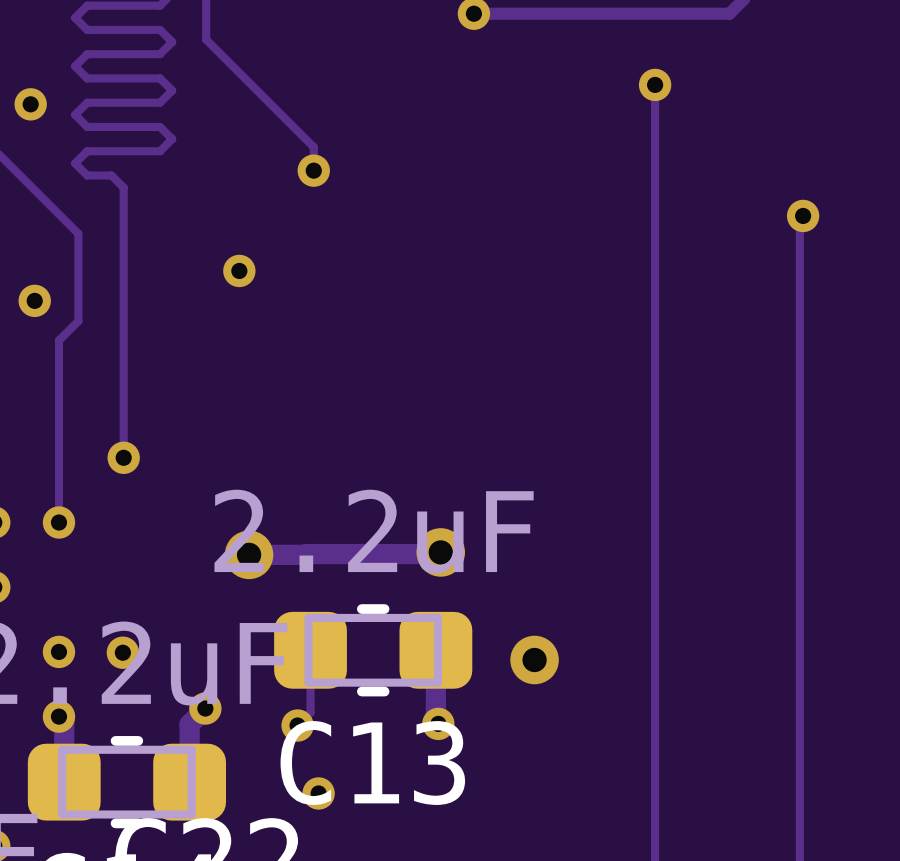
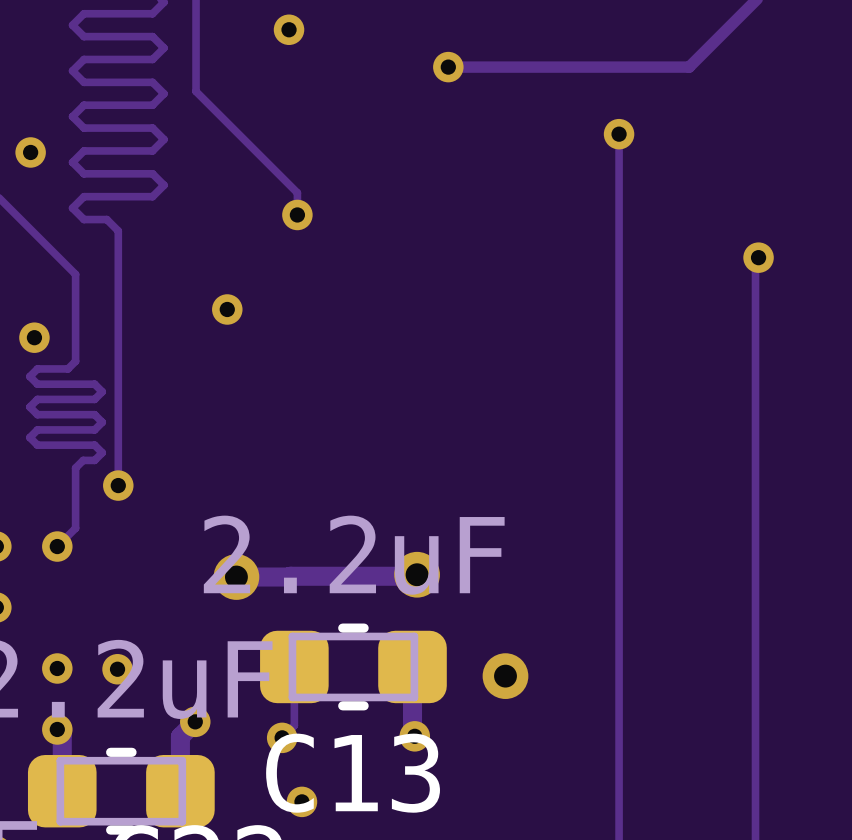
track: (78, 321) (58, 340) (58, 522) -> (75, 356) (75, 361) (67, 368) (37, 368) (29, 376) (37, 384) (94, 384) (102, 391) (94, 399) (37, 399) (29, 407) (37, 414) (94, 414) (102, 422) (94, 429) (37, 429) (29, 437) (37, 445) (94, 445) (102, 452) (94, 460) (83, 460) (75, 468) (75, 528) (57, 546)

